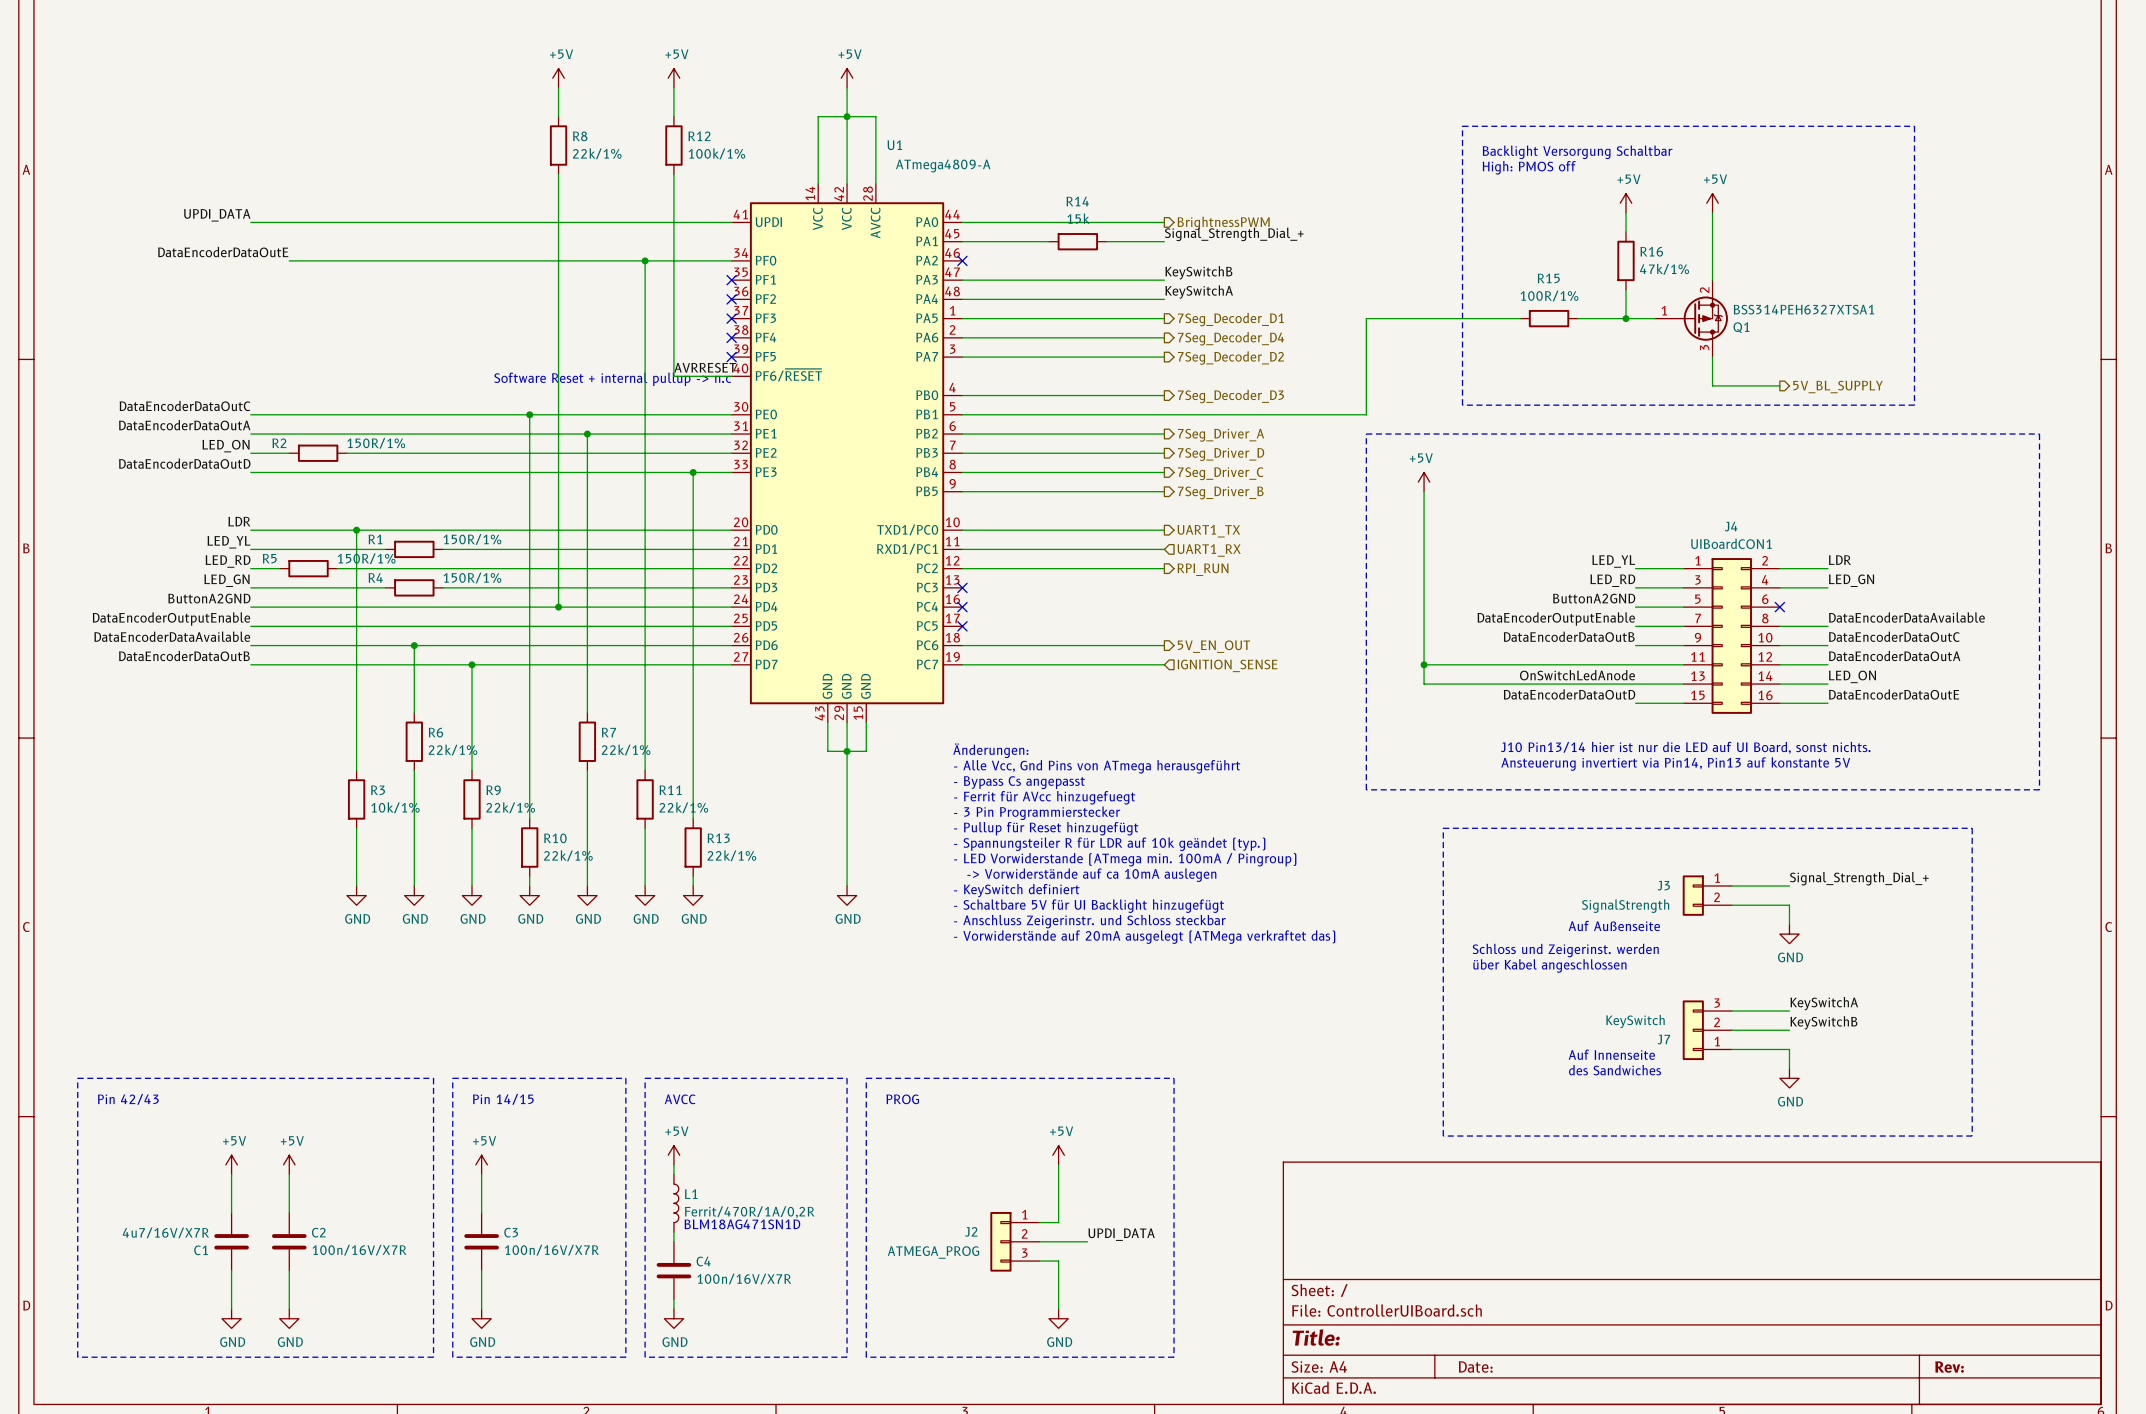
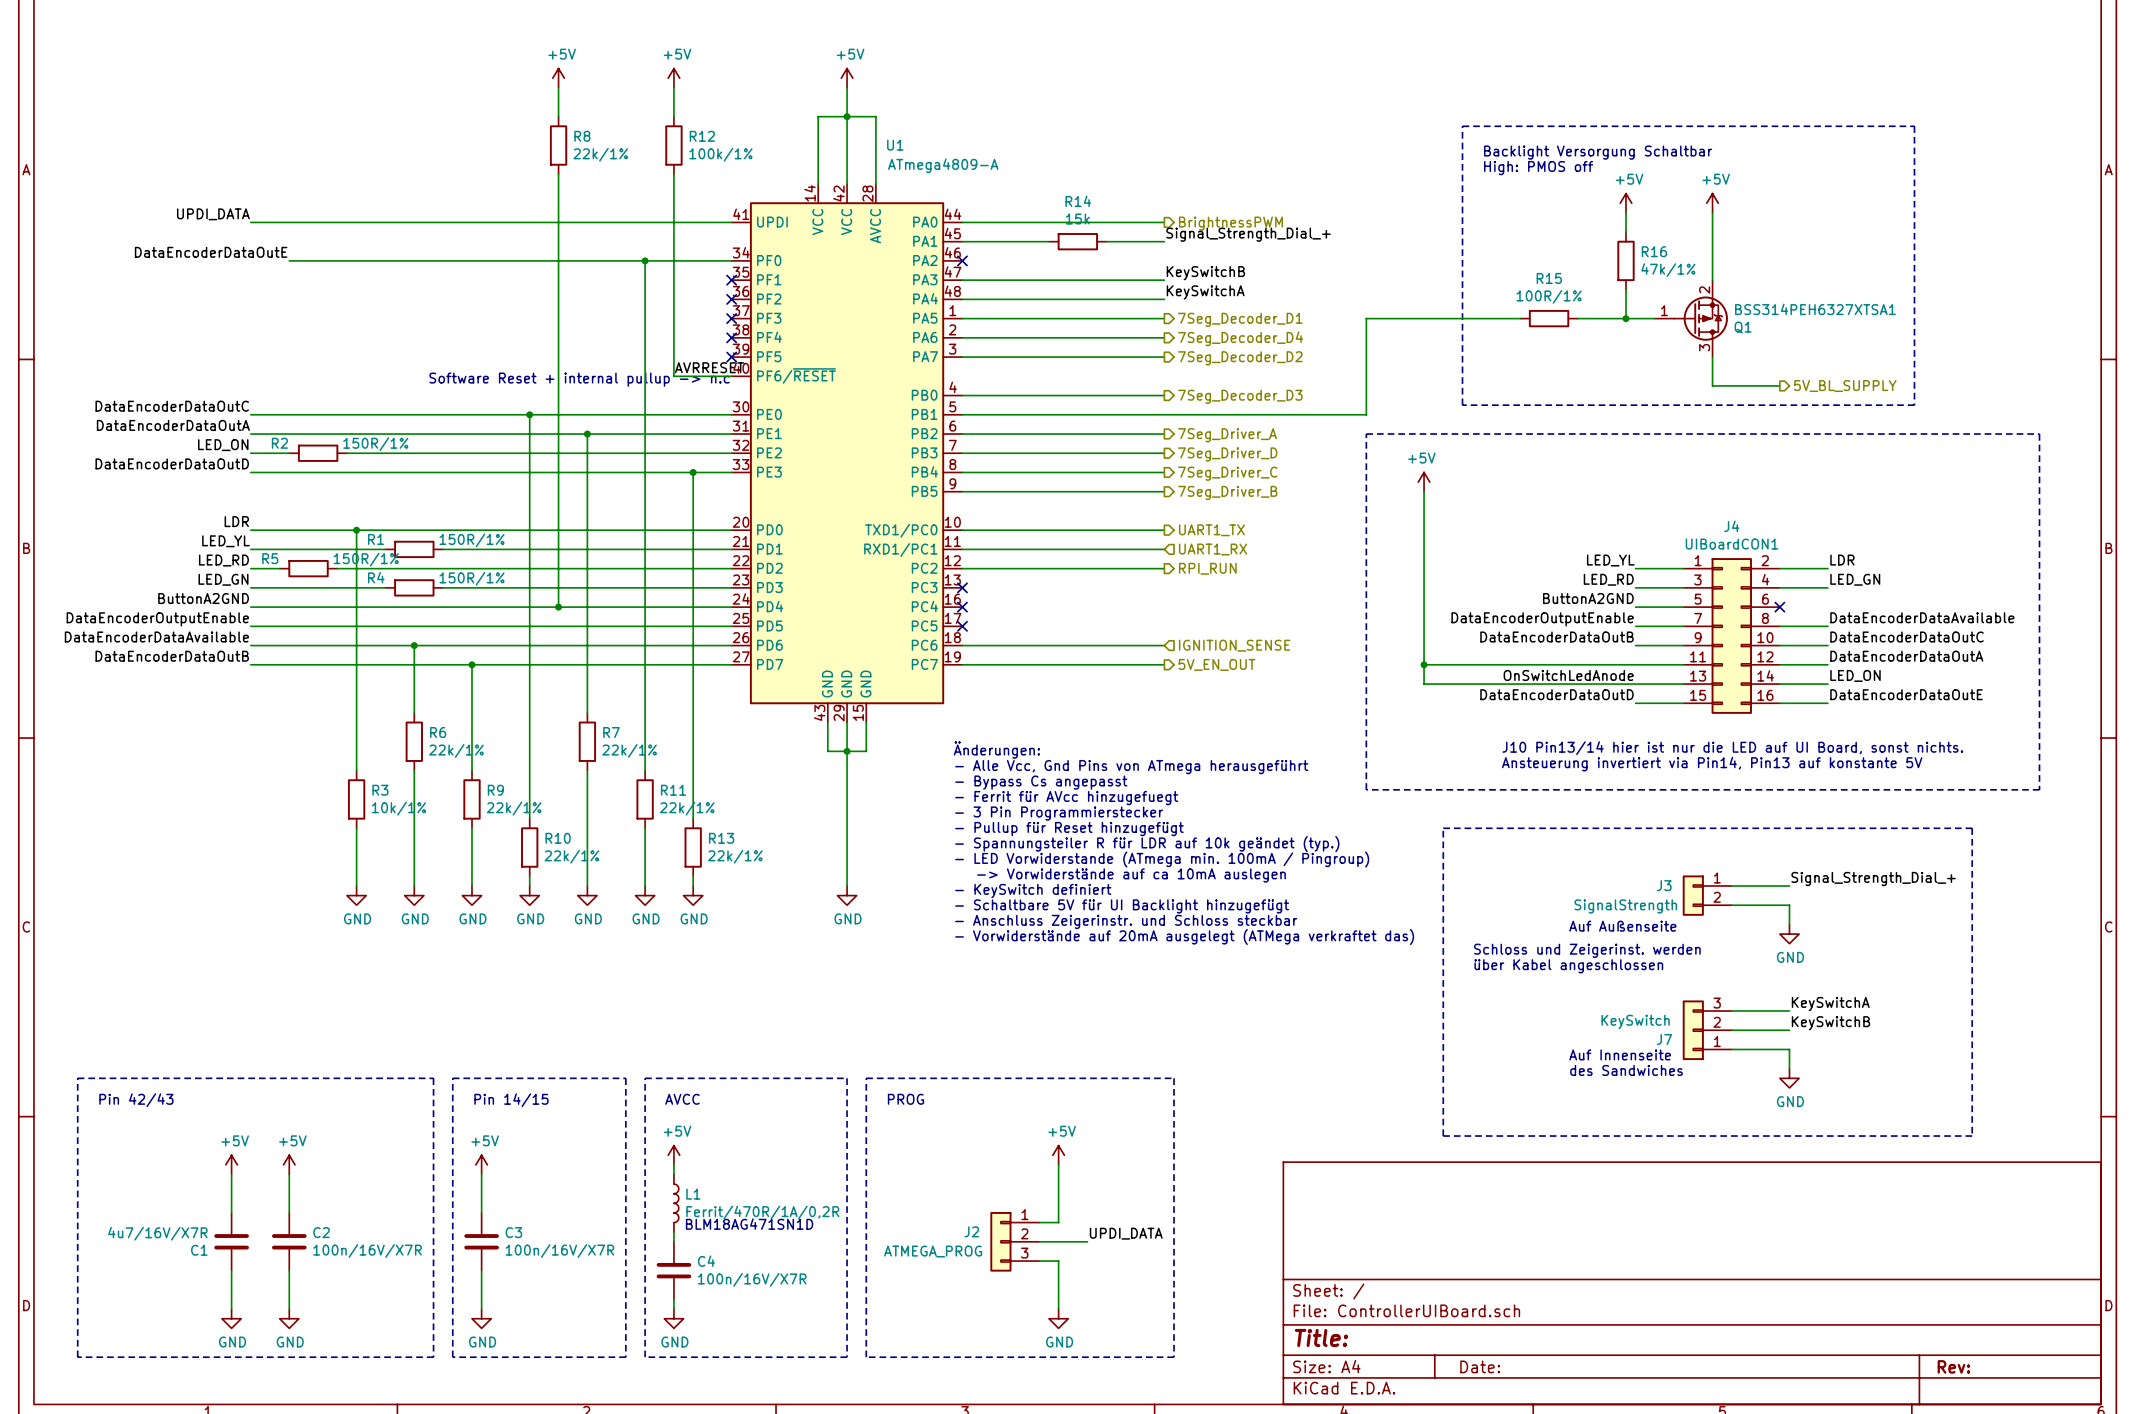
hierarchical label shape: output (1213, 646) -> input (1234, 645)
hierarchical label: 5V_EN_OUT (1213, 646) -> IGNITION_SENSE (1234, 645)
hierarchical label shape: input (1227, 665) -> output (1216, 664)
hierarchical label: IGNITION_SENSE (1227, 665) -> 5V_EN_OUT (1216, 664)

